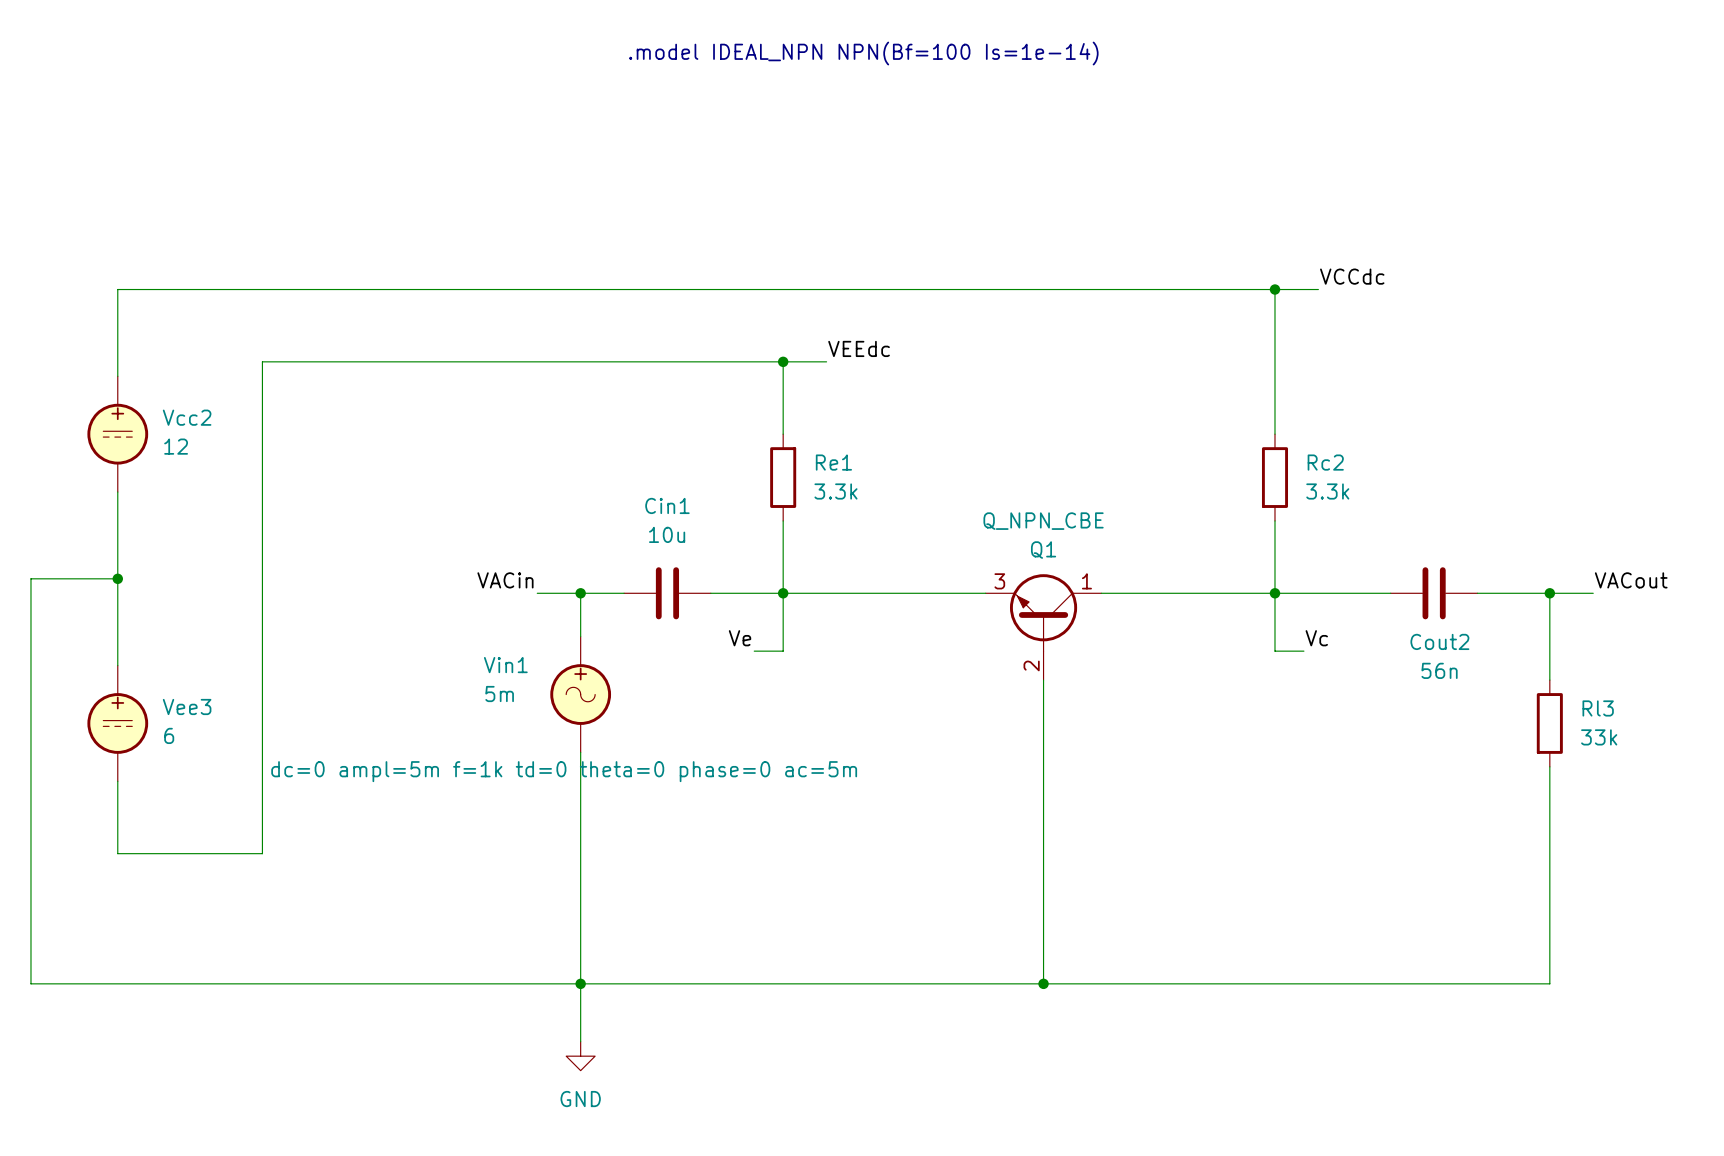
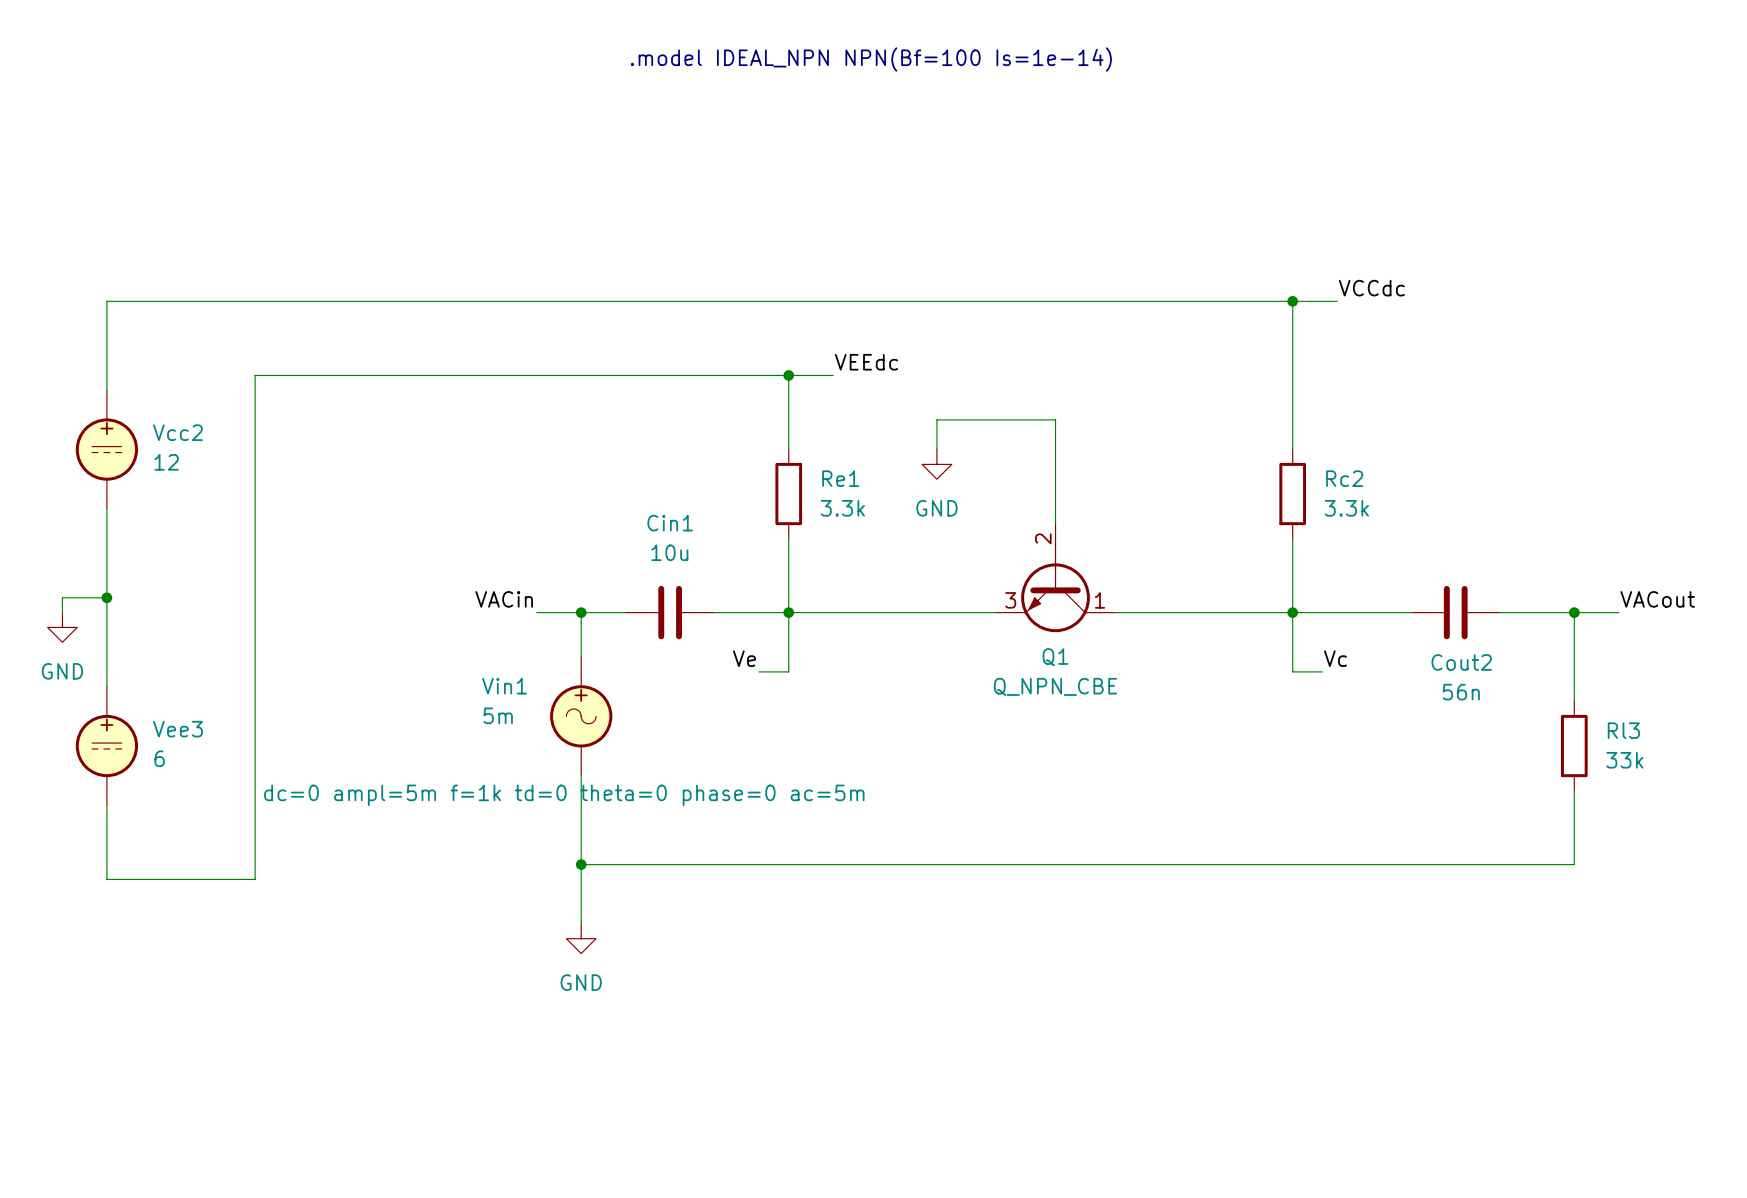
wire: none -> (936, 449) (936, 419) (1055, 419) (1055, 523)
power symbol: none -> GND (936, 464)
wire: (74, 578) (30, 578) (30, 983) (1549, 983) (1549, 839) -> (581, 864) (1574, 864)
wire: none -> (62, 597) (62, 612)
power symbol: none -> GND (62, 627)
Q1 flip: as is (1043, 612) -> up-down (1055, 592)
wire: (1043, 680) (1043, 983) -> none
junction: none -> (581, 864)
wire: (580, 897) (580, 1041) -> none
junction: (580, 983) -> none
junction: (1043, 983) -> none
power symbol position: GND (580, 1056) -> GND (581, 938)

